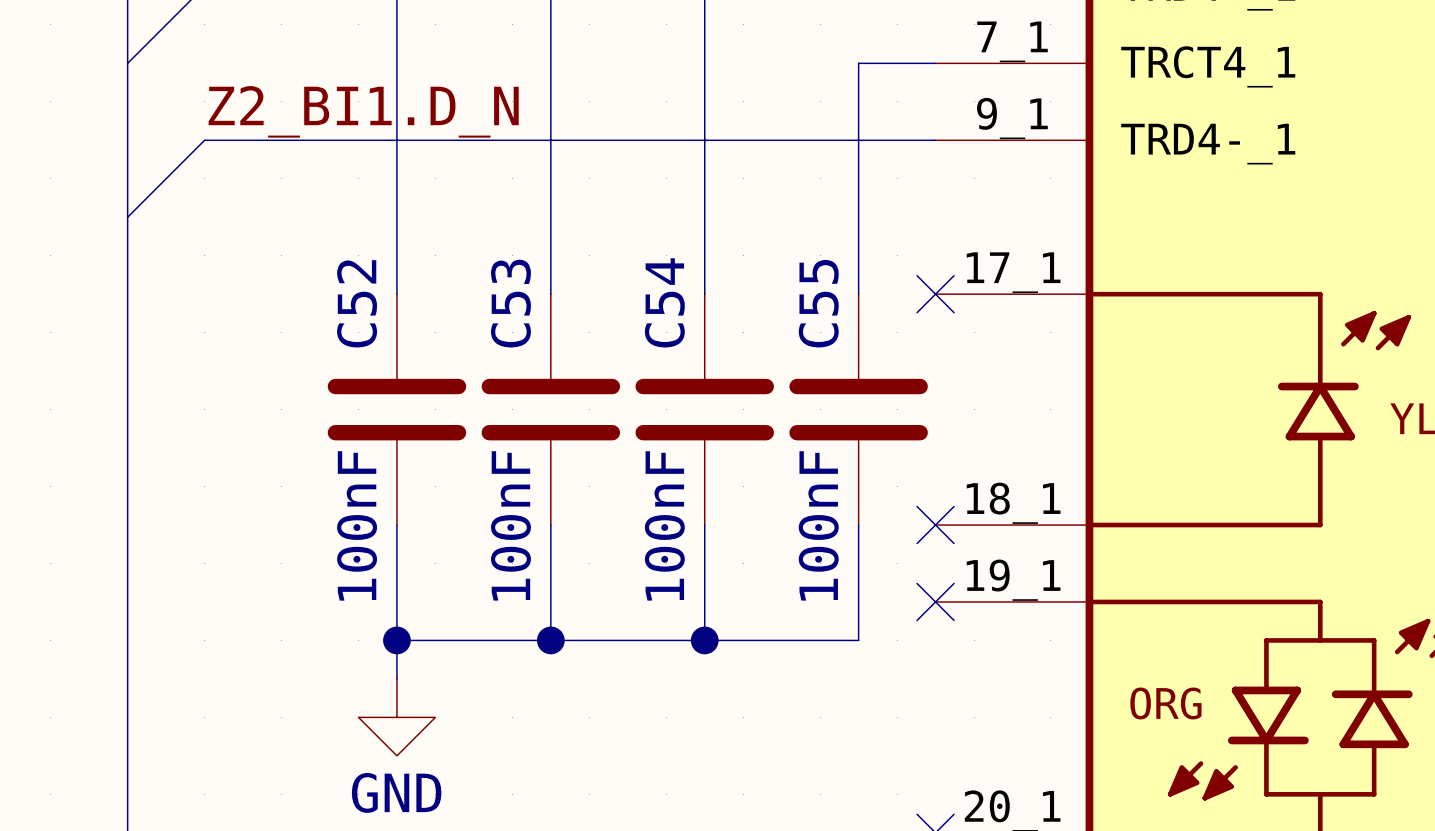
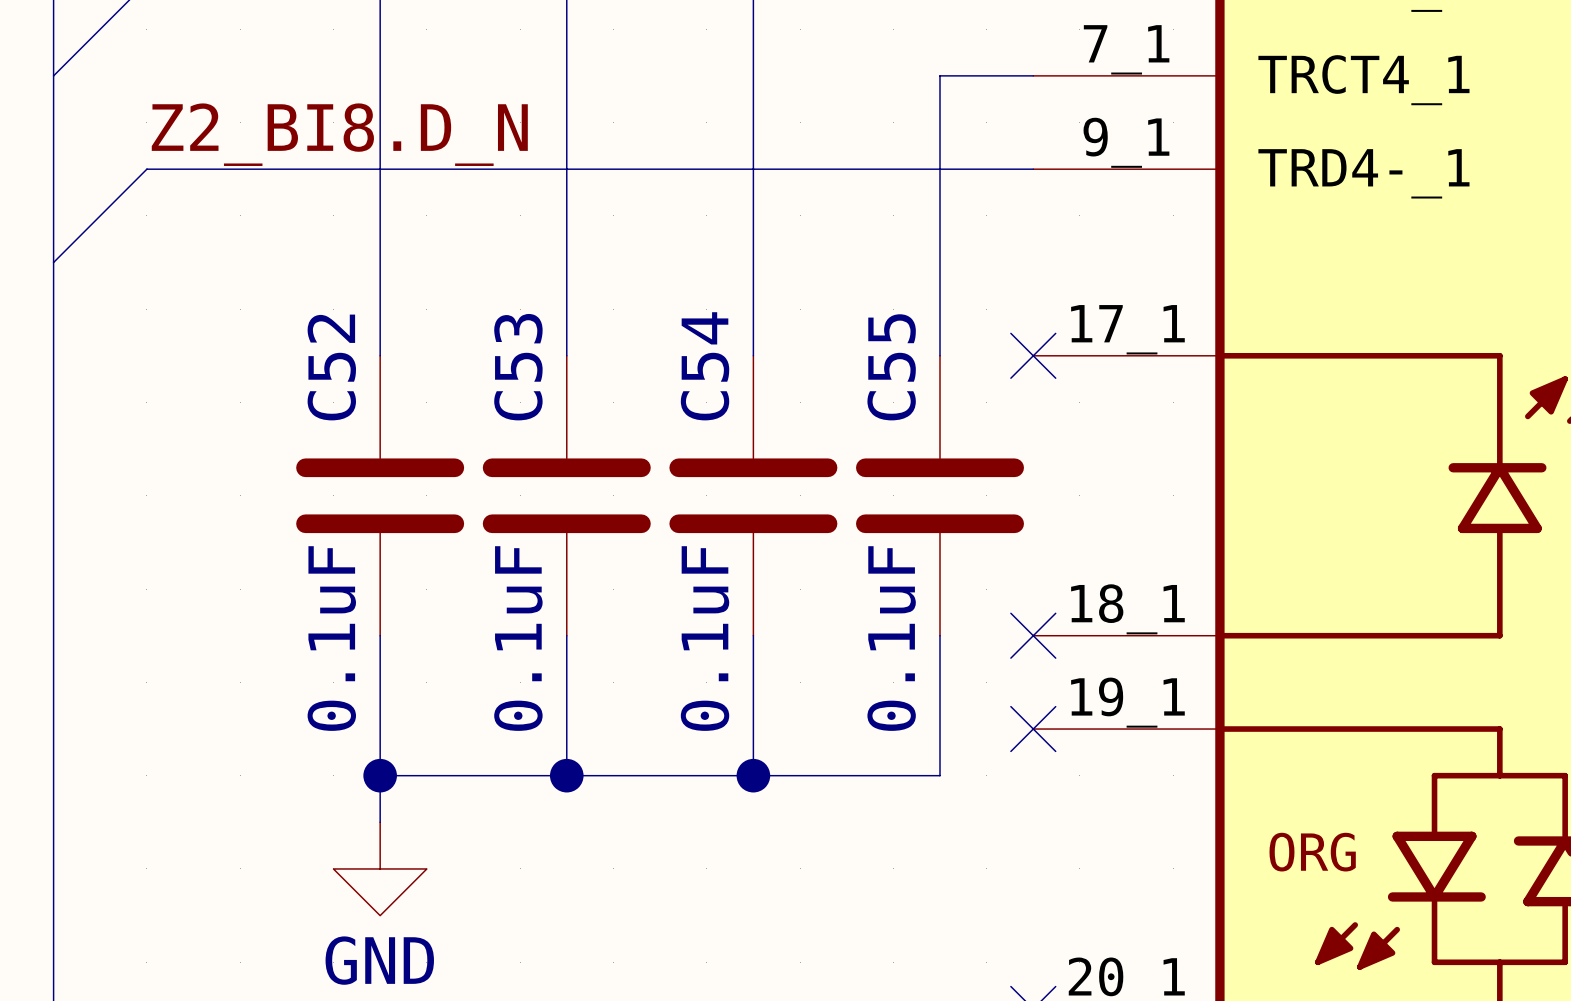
label: Z2_BI1.D_N (363, 111) -> Z2_BI8.D_N (339, 134)
C52 value: 100nF (357, 525) -> 0.1uF (331, 638)
C53 value: 100nF (510, 525) -> 0.1uF (518, 638)
C54 value: 100nF (664, 525) -> 0.1uF (705, 638)
C55 value: 100nF (818, 525) -> 0.1uF (891, 638)

